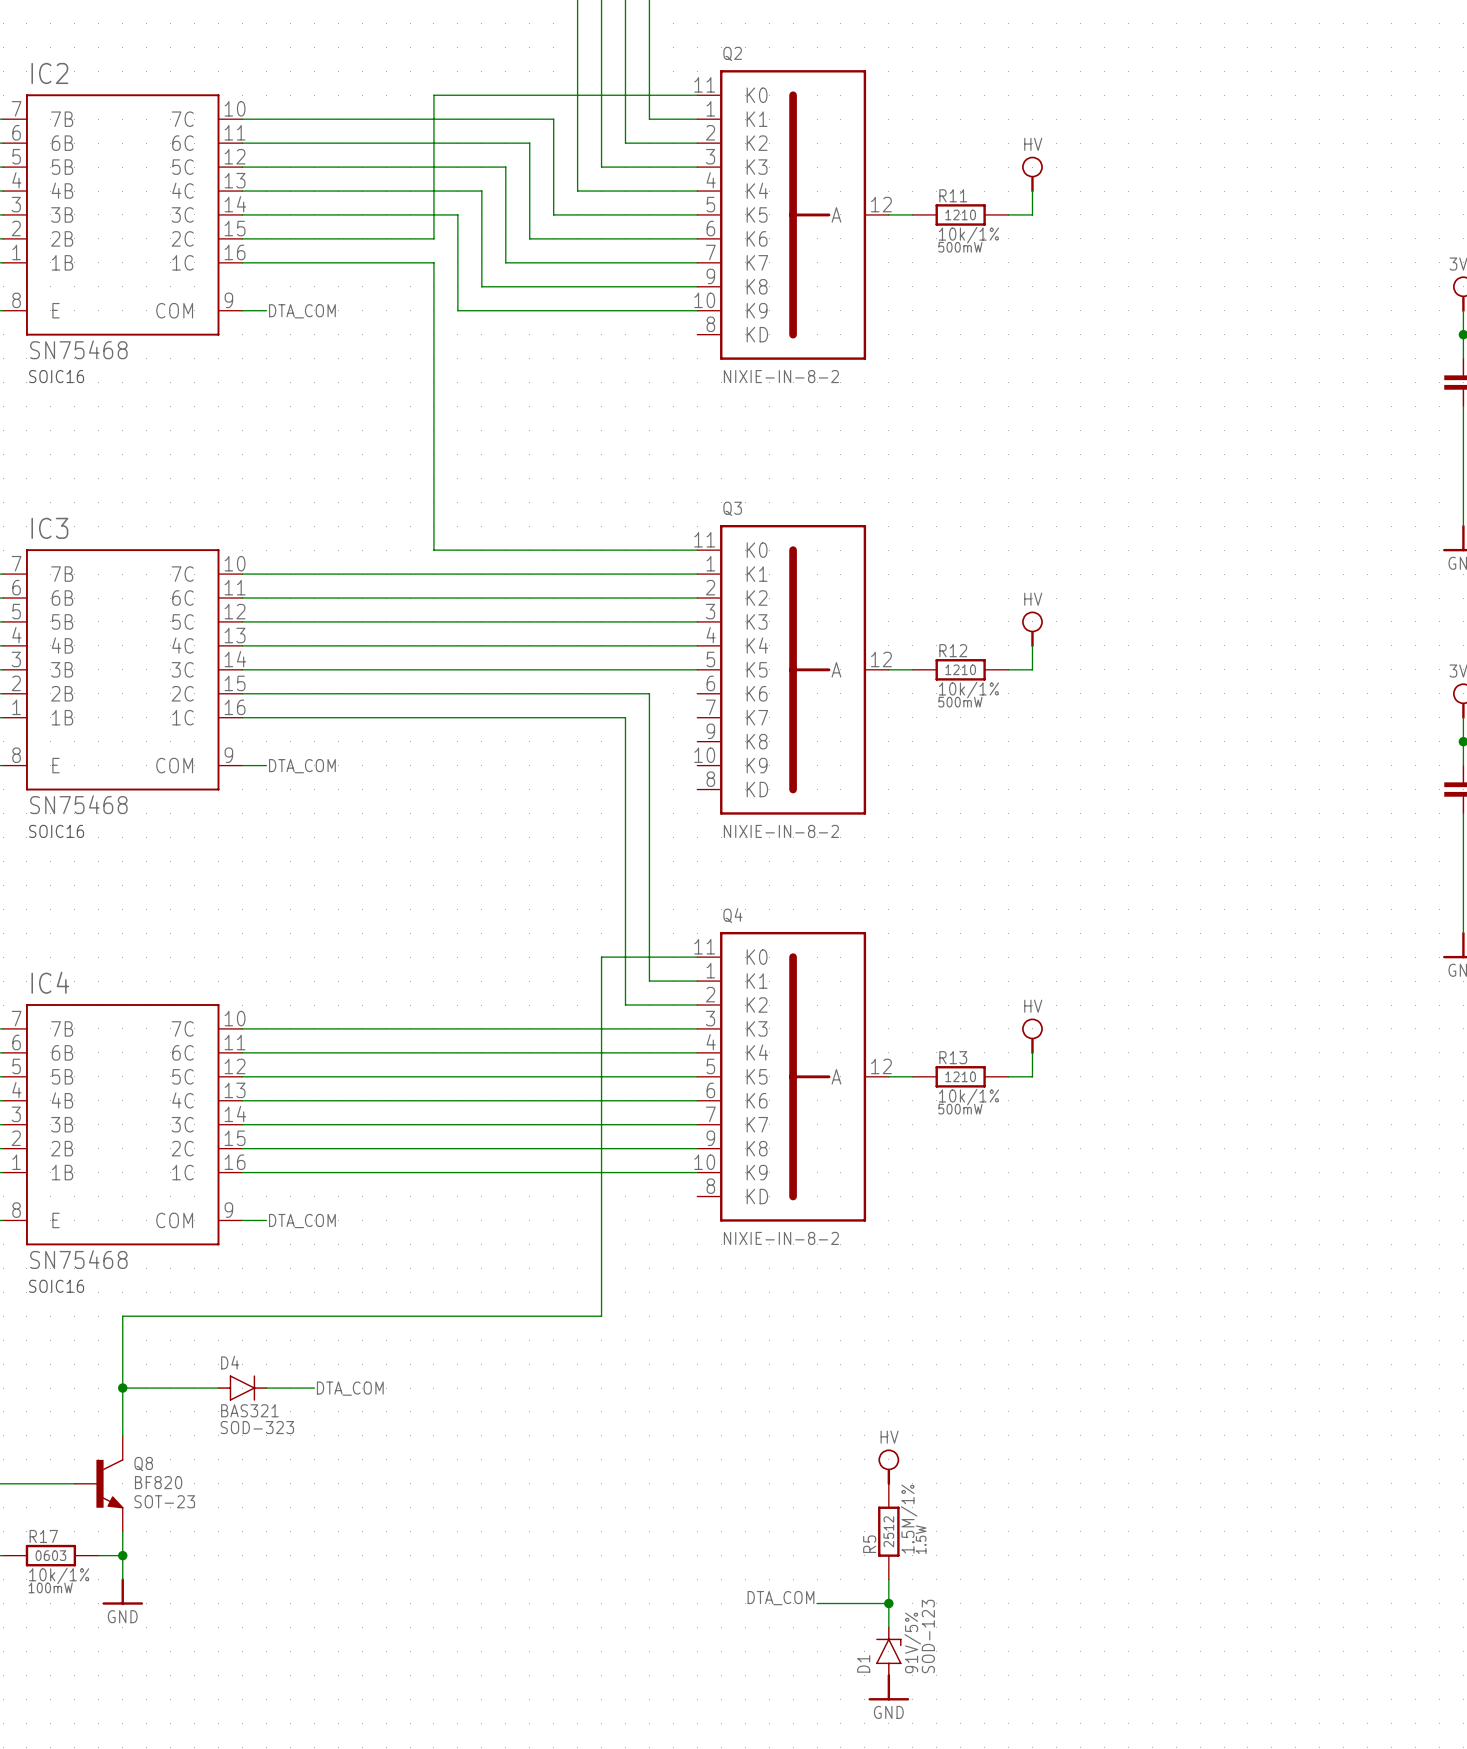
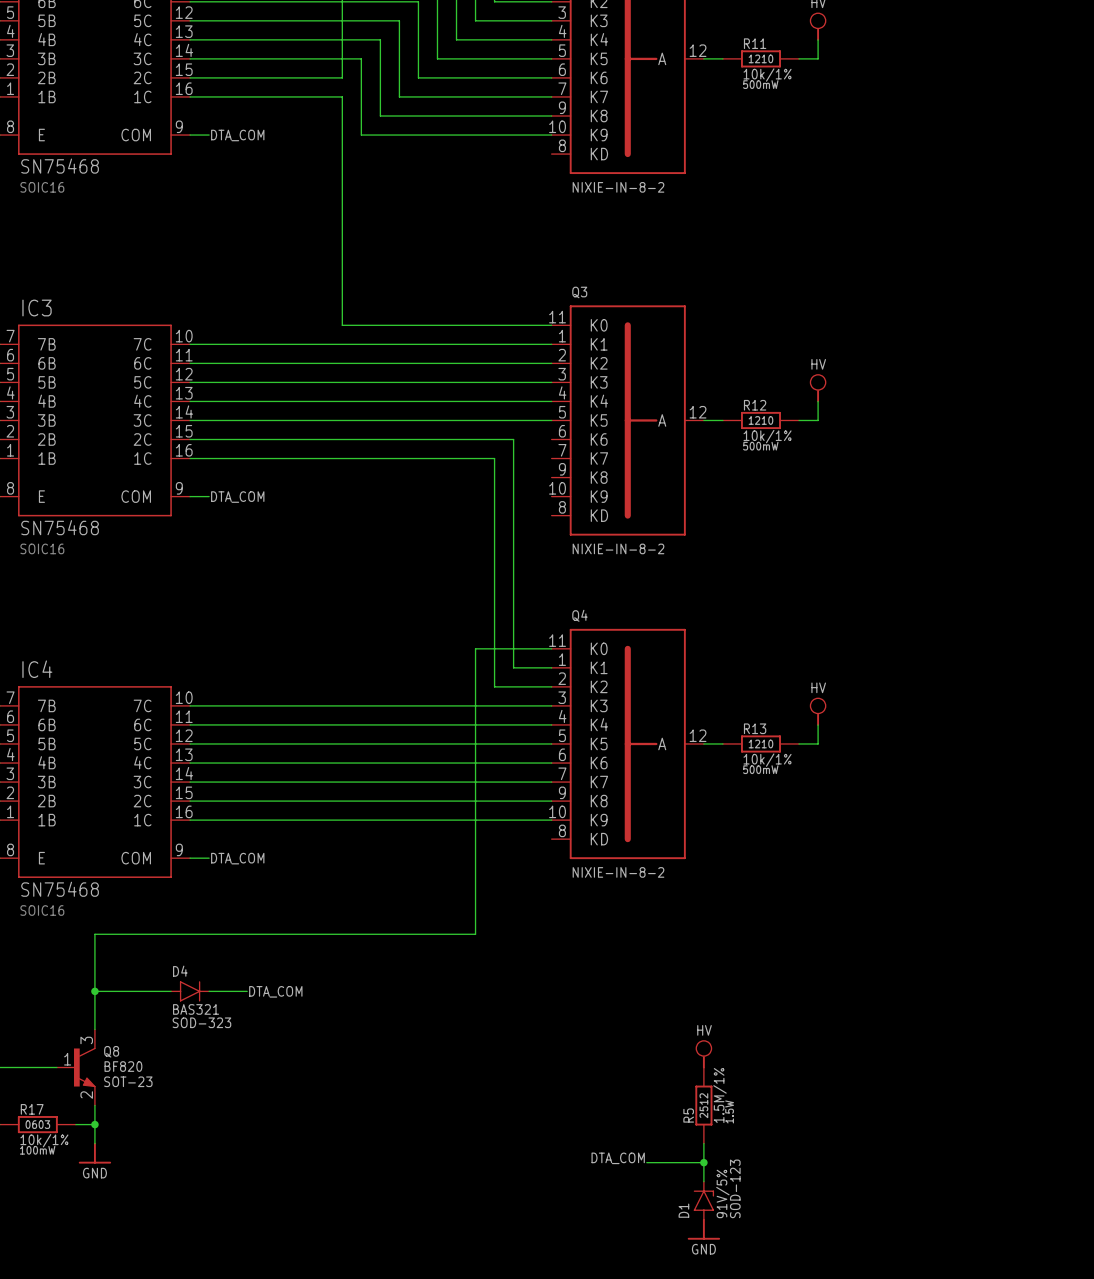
Q8 pin number: none -> 3 (86, 1040)
Q8 pin number: none -> 1 (67, 1059)
Q8 pin number: none -> 2 (86, 1095)

